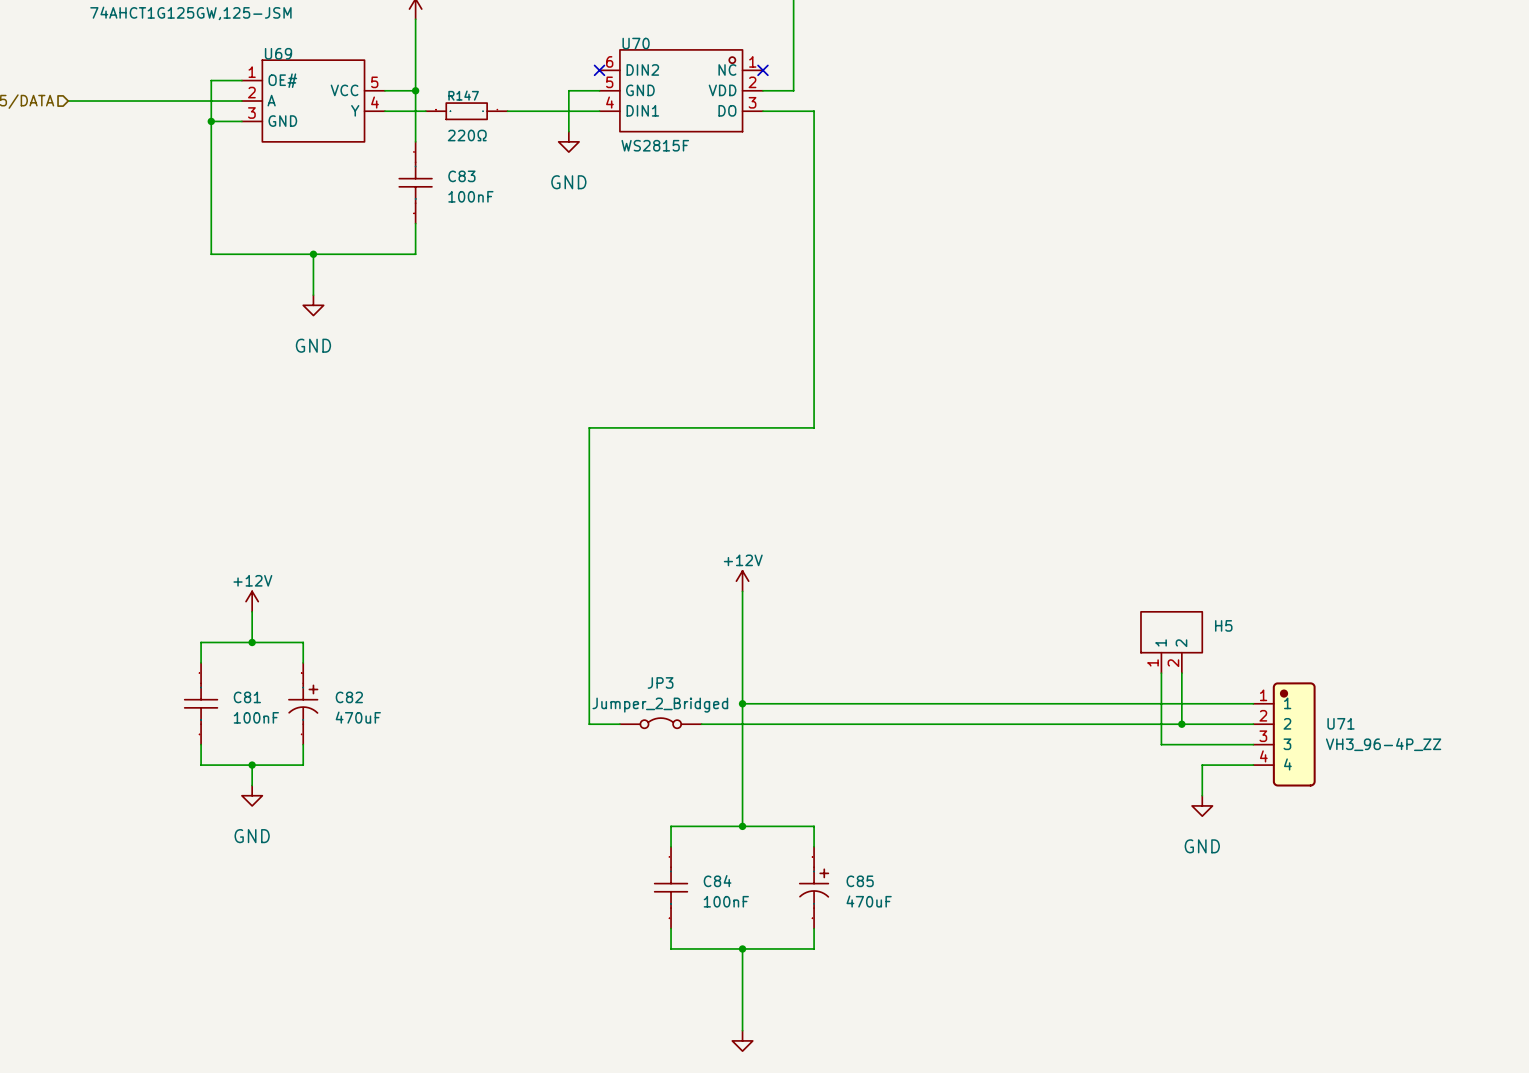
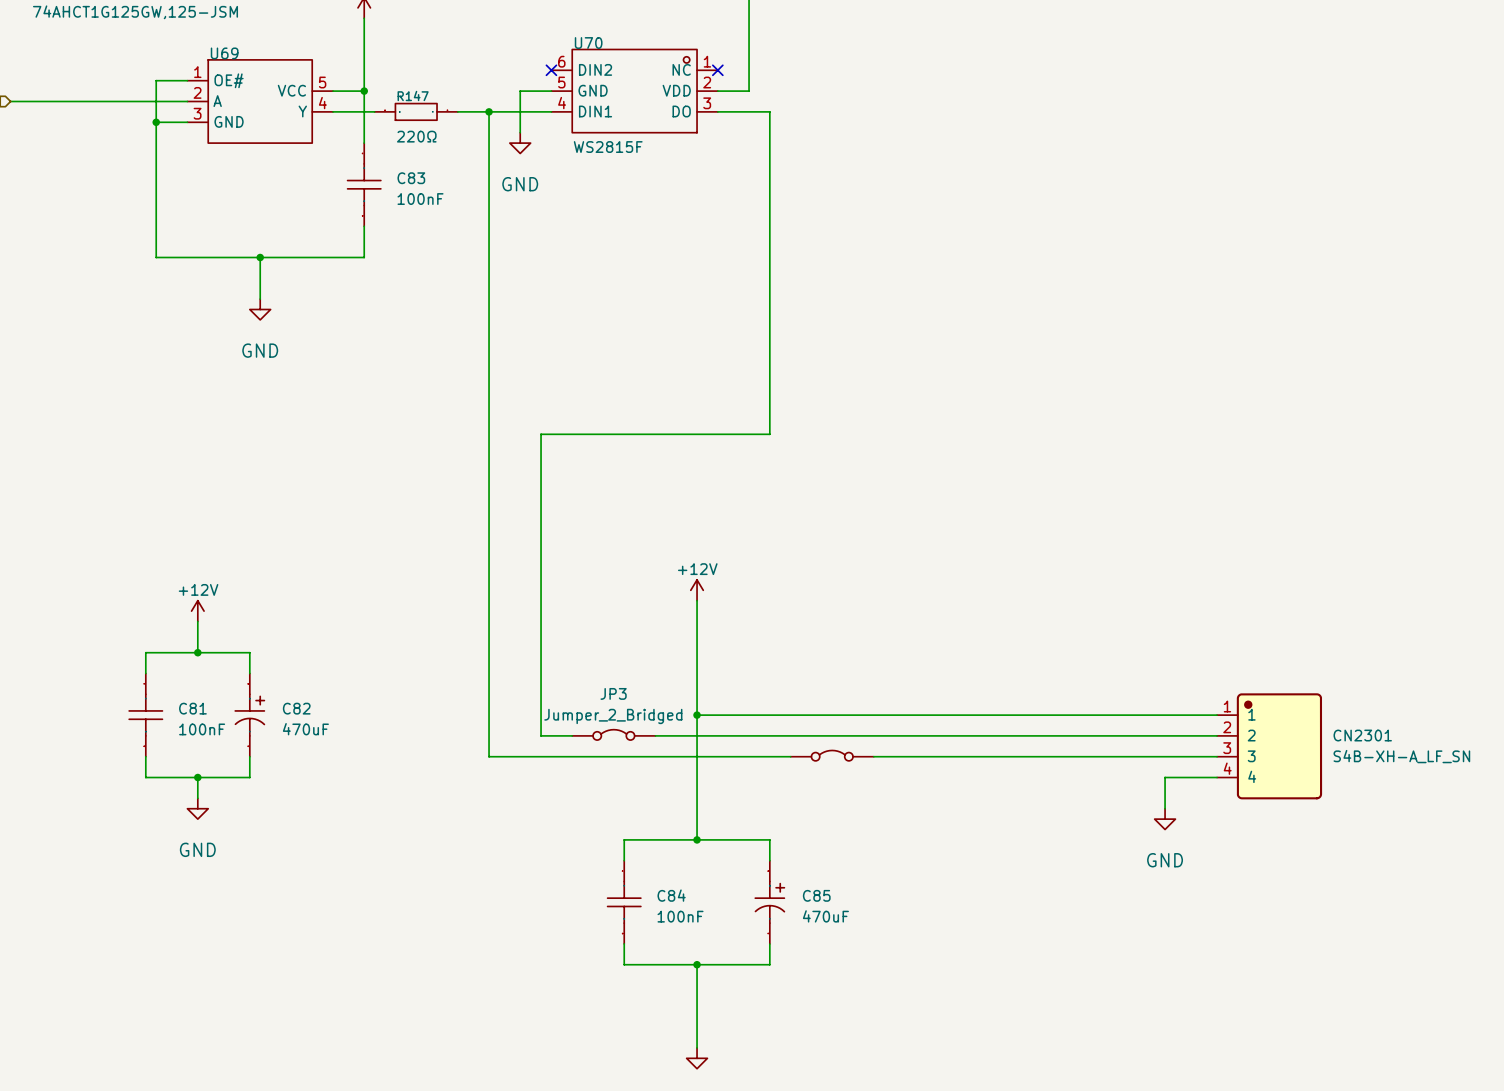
wire: none -> (489, 111) (489, 756) (790, 756)
junction: none -> (489, 111)
H5: (1171, 642) -> none
wire: (1161, 673) (1161, 744) -> (873, 756) (1123, 756)
wire: (1181, 673) (1181, 724) -> none
junction: (1181, 724) -> none
U71: VH3_96-4P_ZZ (1284, 734) -> none
CN2301: none -> S4B-XH-A_LF_SN (1269, 746)
part: none -> (832, 755)

